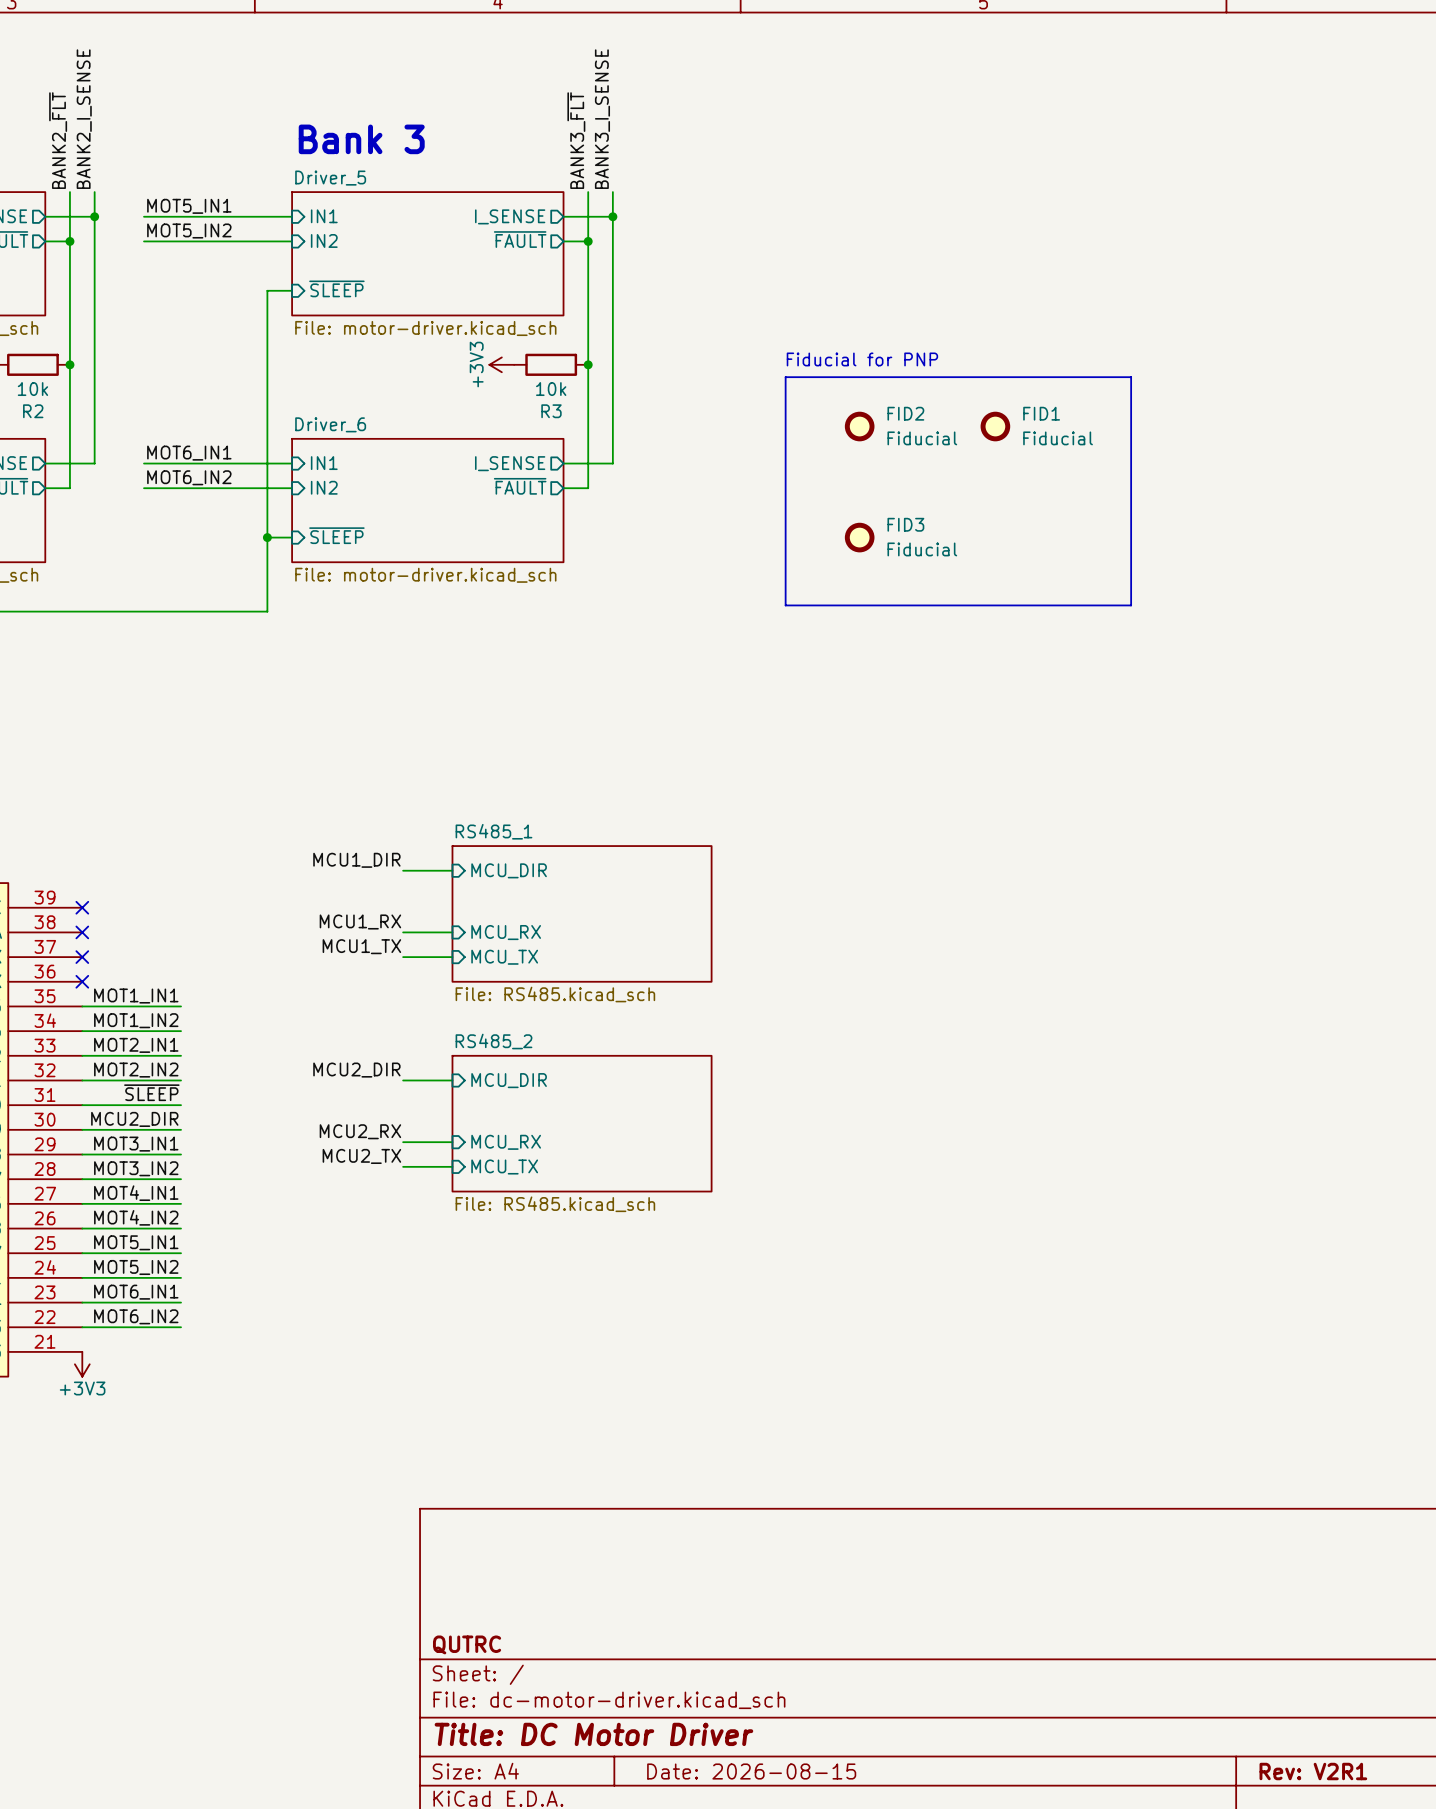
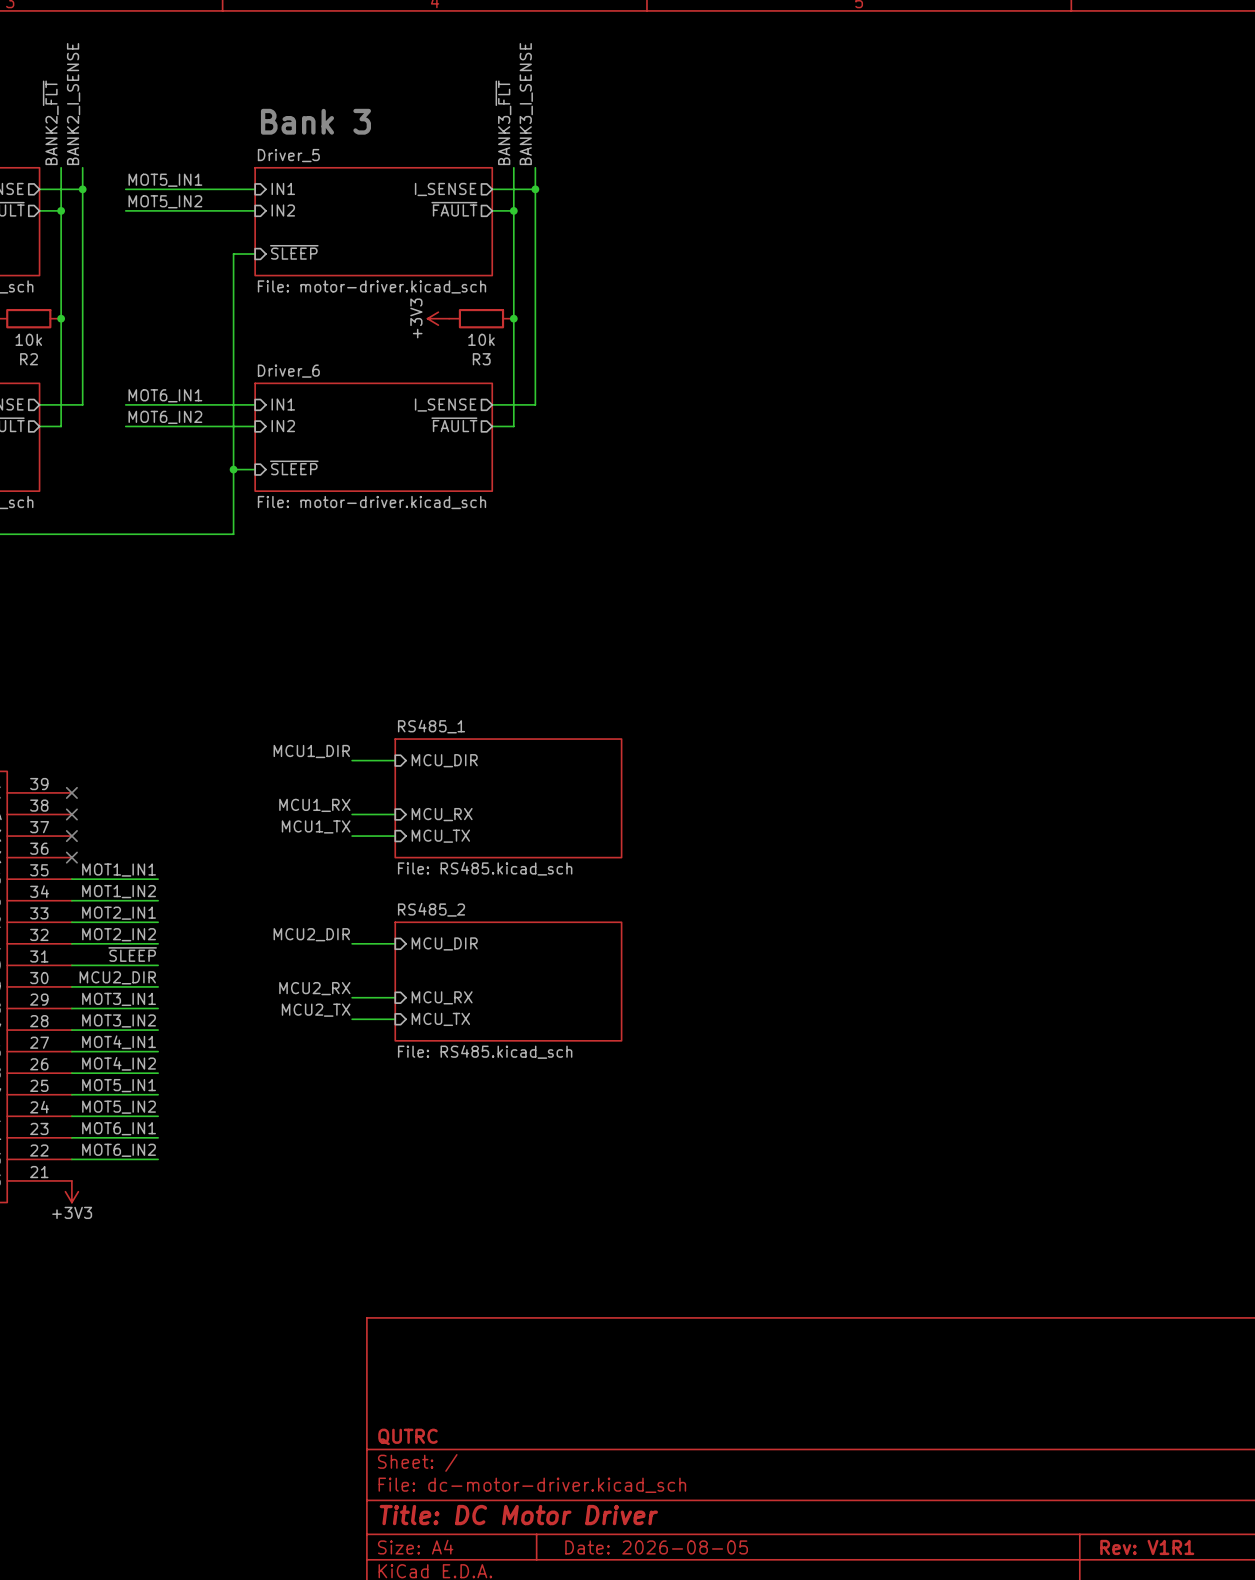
text: Fiducial for PNP (862, 359) -> none
line: (785, 377) (1131, 377) (1131, 605) (785, 605) (785, 377) -> none
FID2: Fiducial (859, 426) -> none
FID1: Fiducial (995, 426) -> none
FID3: Fiducial (859, 537) -> none
title block: Date: 2026-08-15 (751, 1771) -> Date: 2026-08-05 (656, 1547)
title block: Rev: V2R1 (1313, 1771) -> Rev: V1R1 (1147, 1547)

